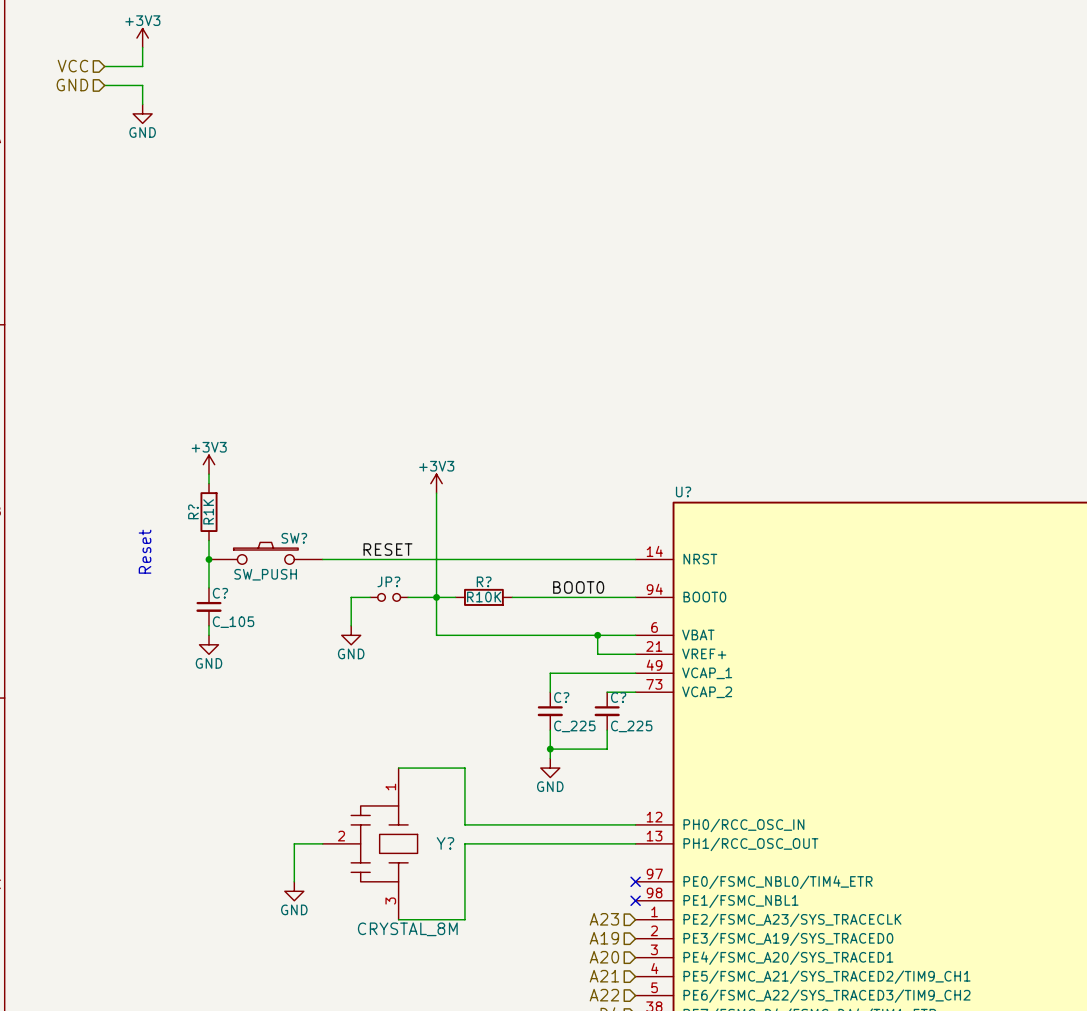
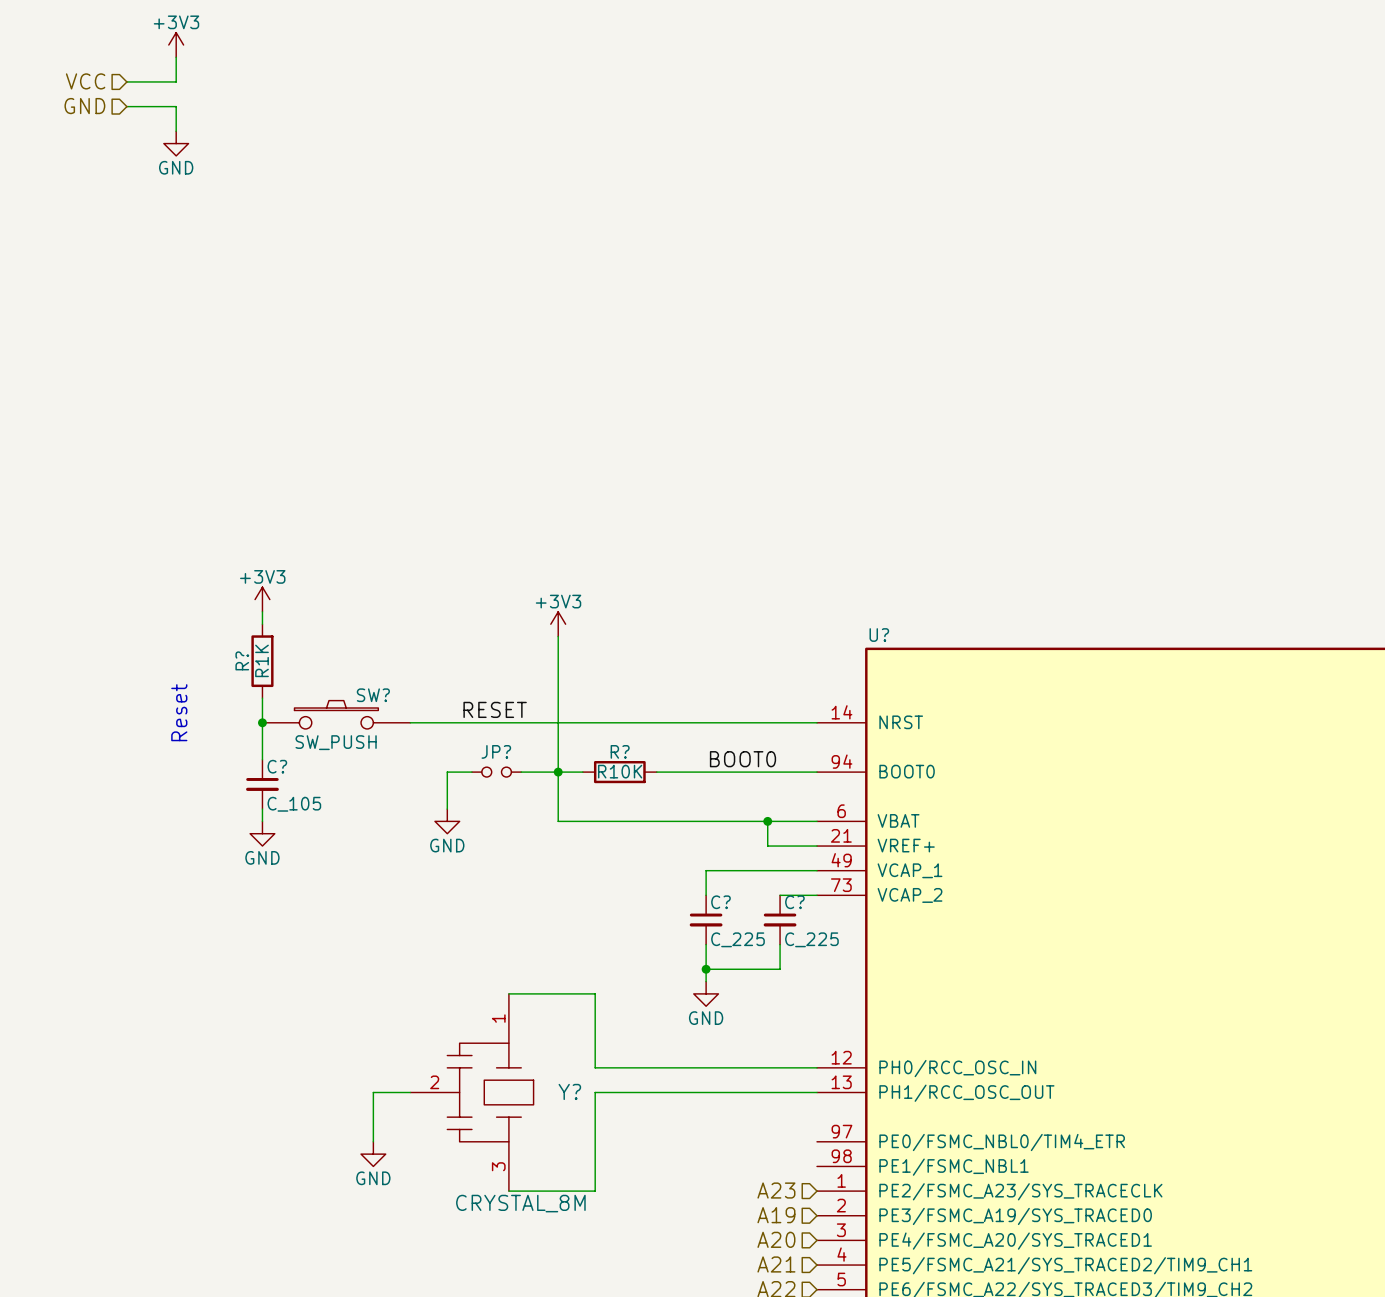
no-connect mark: (635, 881) -> none
no-connect mark: (635, 900) -> none

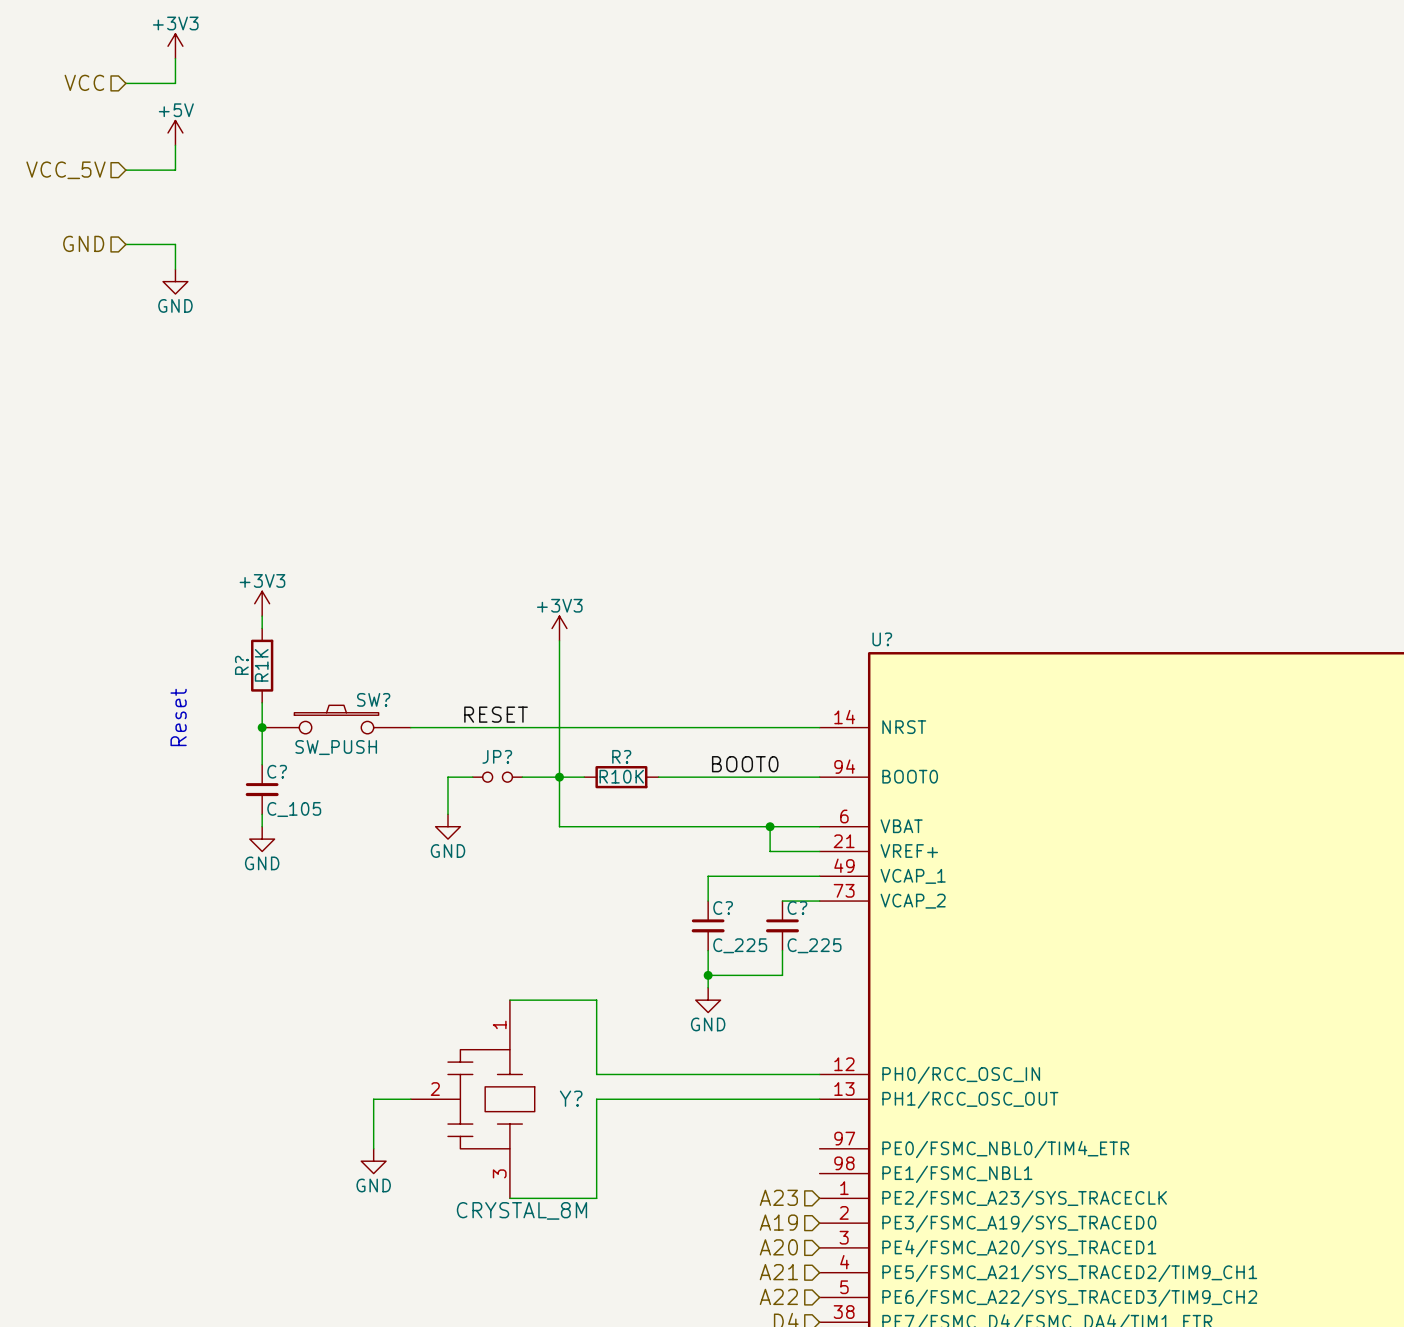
hierarchical label position: GND (84, 106) -> GND (83, 243)
wire: (126, 106) (176, 106) (176, 131) -> (125, 244) (175, 244) (175, 269)
power symbol: none -> +5V (175, 132)
wire: none -> (175, 145) (175, 170) (125, 170)
power symbol position: GND (176, 143) -> GND (175, 281)
hierarchical label: none -> VCC_5V (65, 170)

